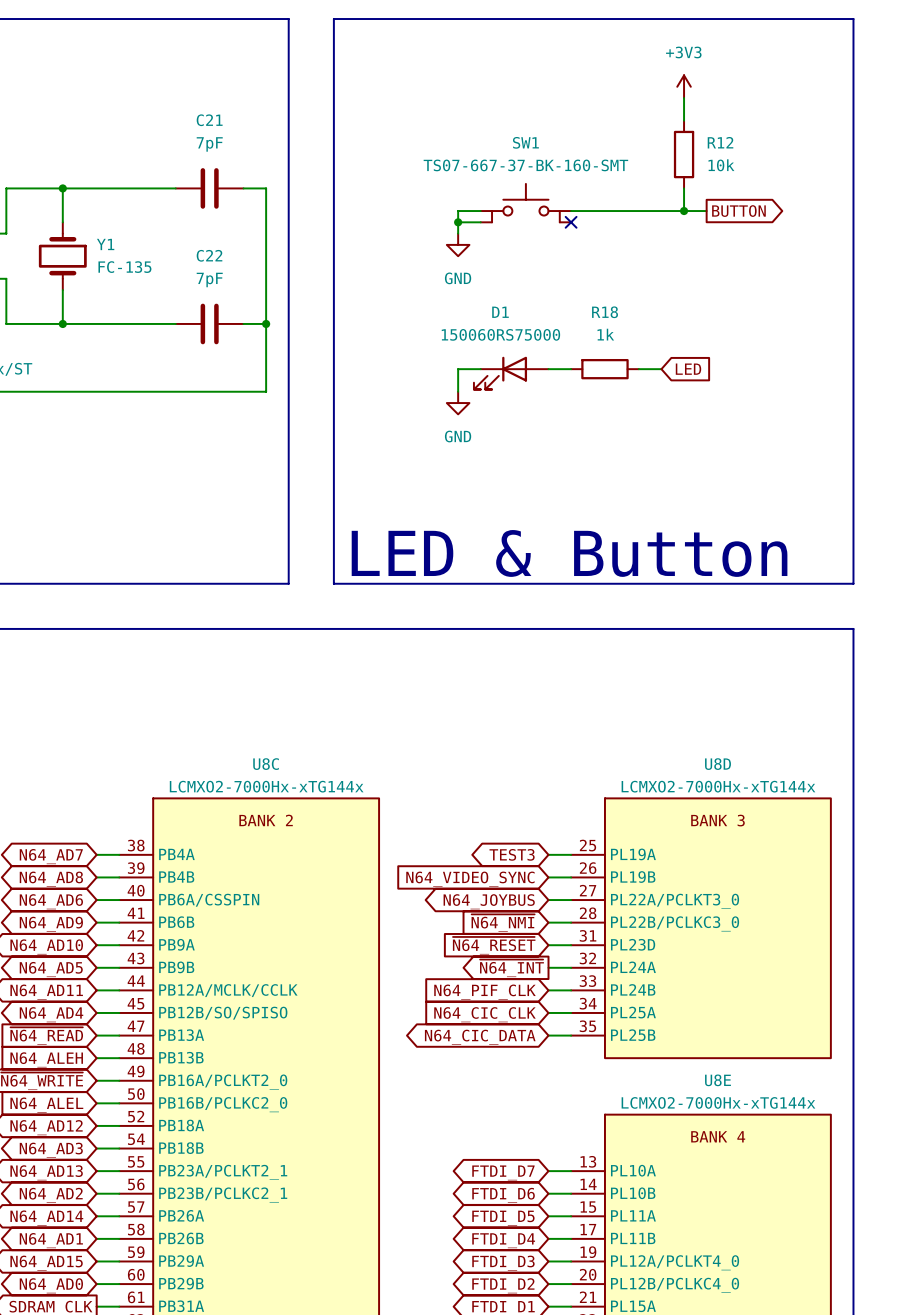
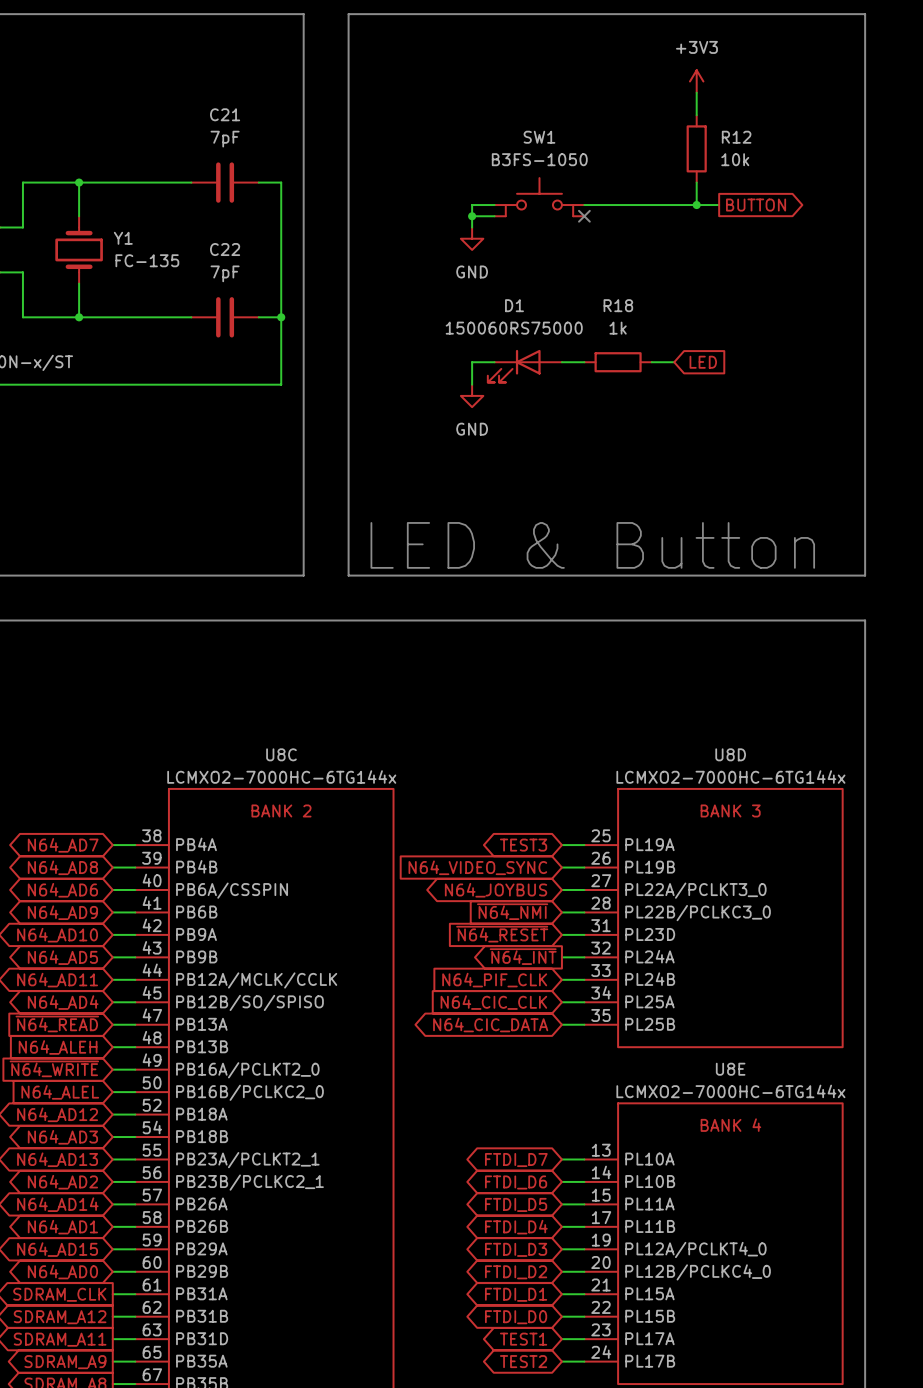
SW1 value: TS07-667-37-BK-160-SMT (525, 165) -> B3FS-1050 (539, 159)
U8C value: LCMXO2-7000Hx-xTG144x (266, 786) -> LCMXO2-7000HC-6TG144x (281, 777)
U8D value: LCMXO2-7000Hx-xTG144x (718, 786) -> LCMXO2-7000HC-6TG144x (730, 777)
U8E value: LCMXO2-7000Hx-xTG144x (718, 1102) -> LCMXO2-7000HC-6TG144x (730, 1091)

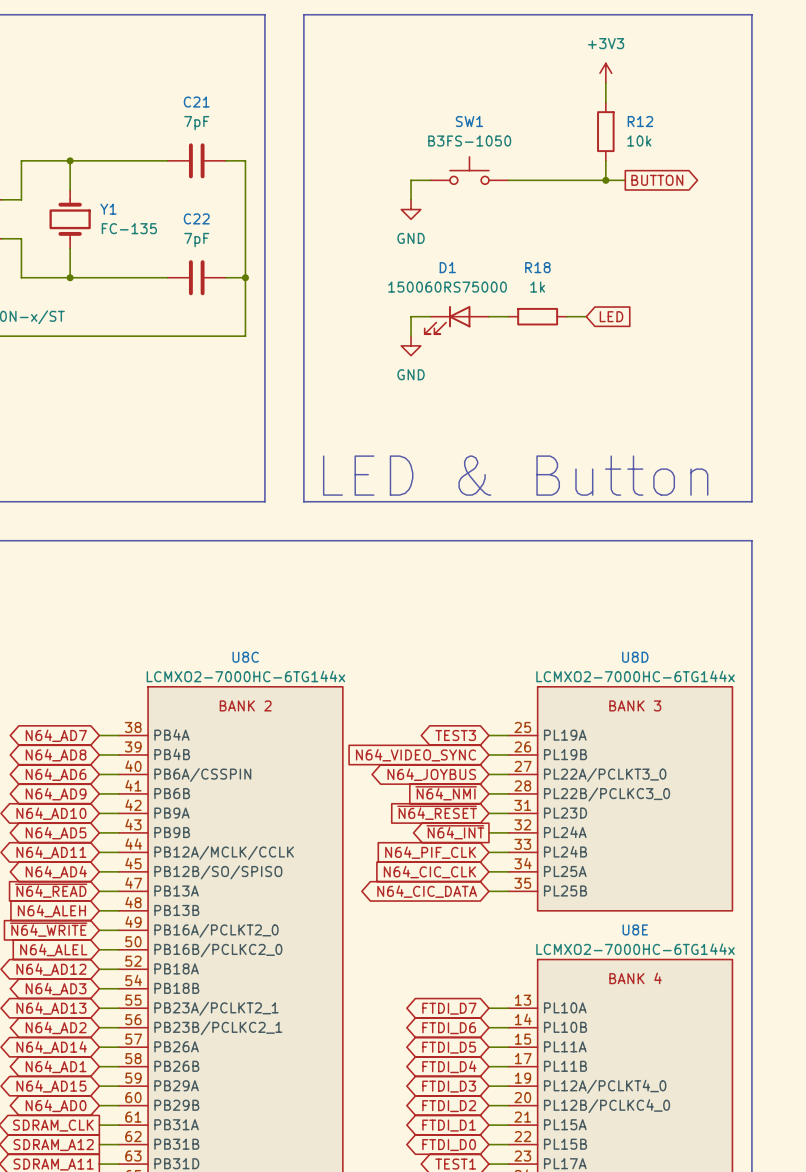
SW1 symbol: [494, 178, 585, 217] -> [430, 156, 509, 185]
wire: (472, 216) (494, 216) -> none
junction: (472, 216) -> none
no-connect mark: (584, 216) -> none

